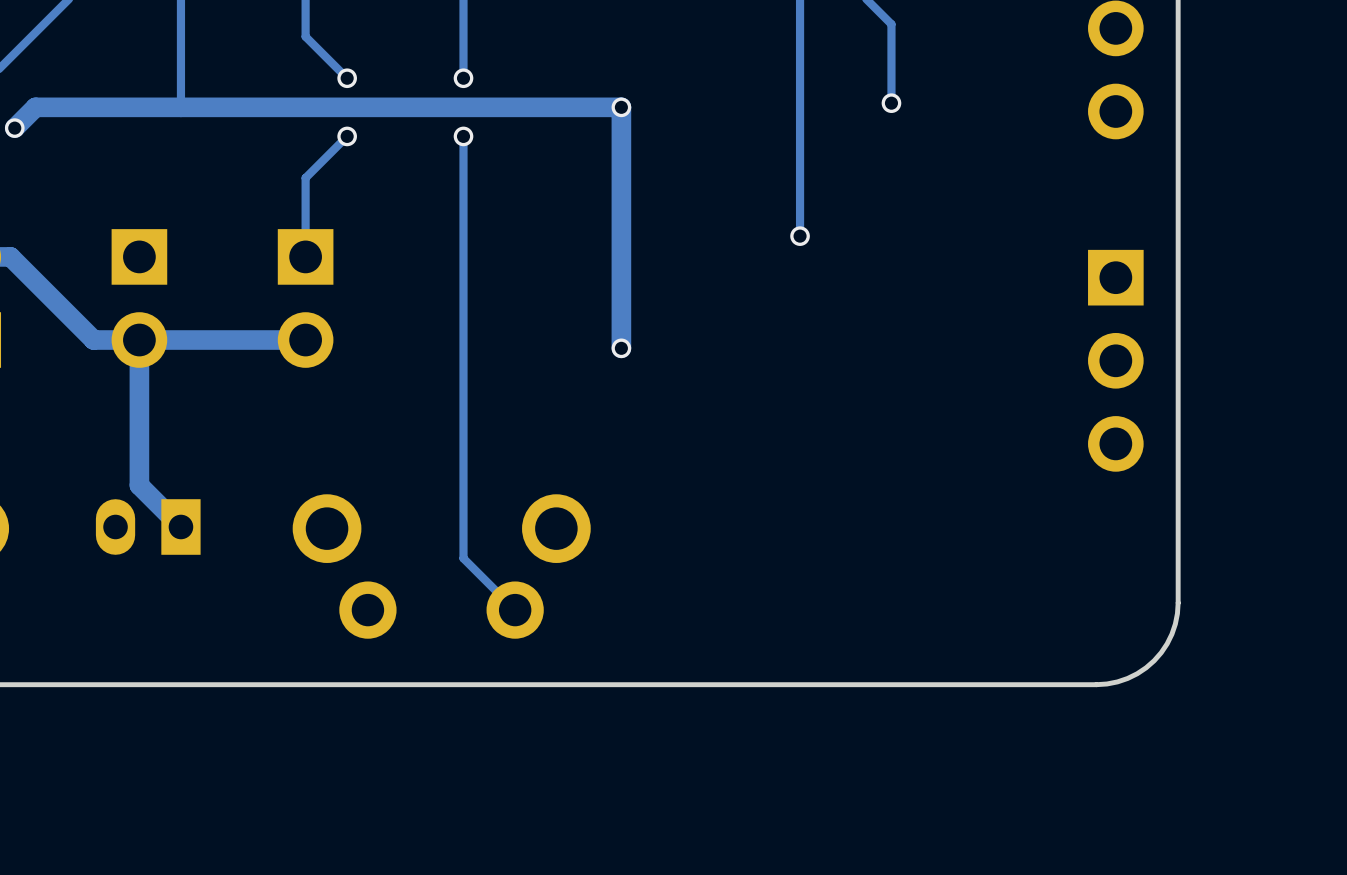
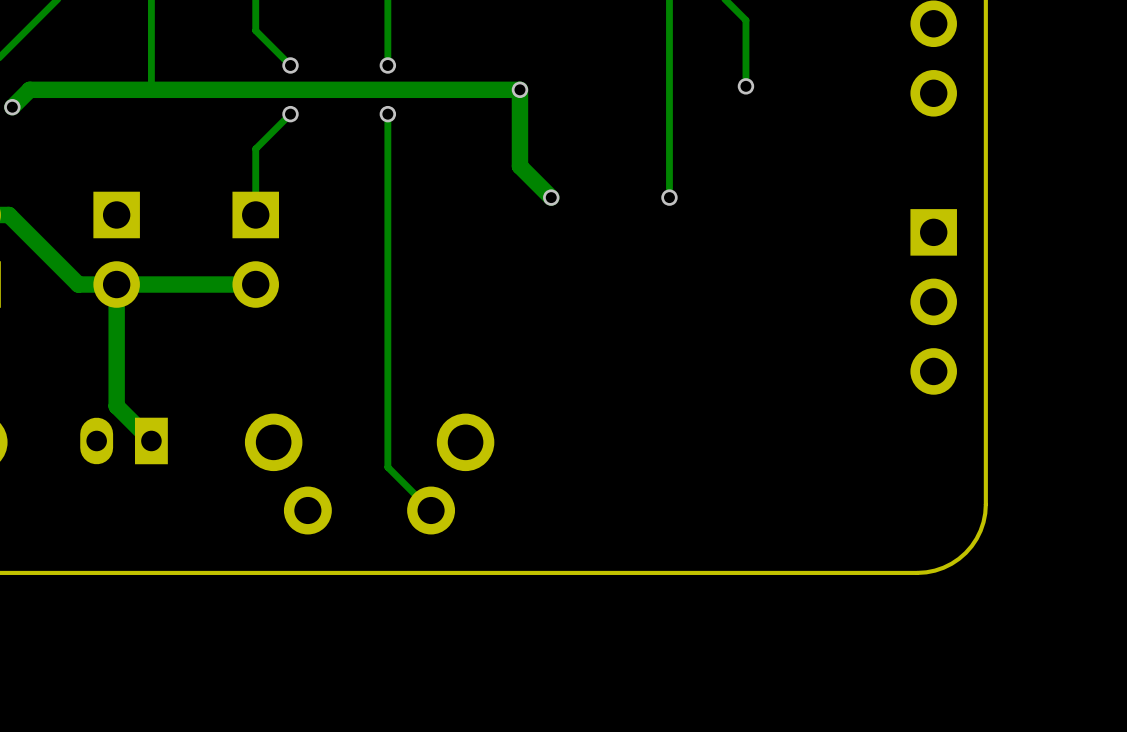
track: (621, 198) (621, 348) -> (519, 166) (551, 197)
via position: (621, 348) -> (551, 197)

